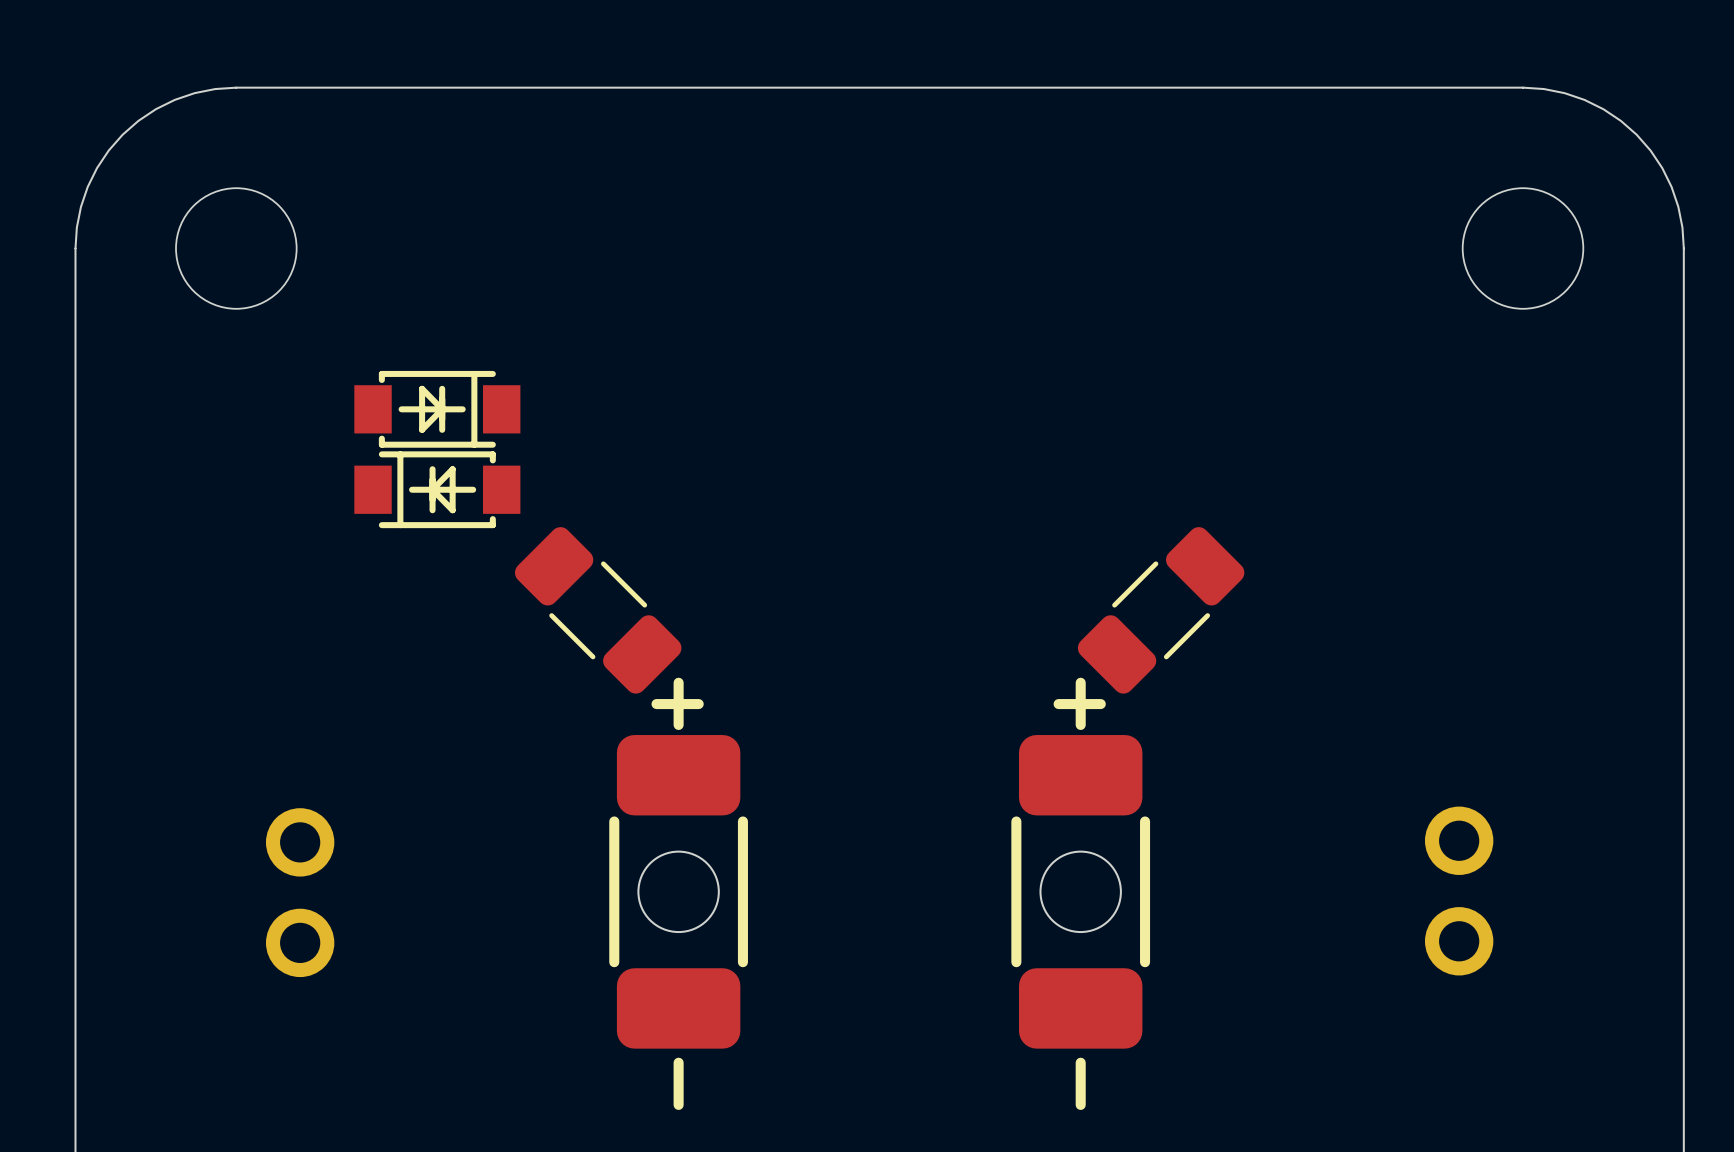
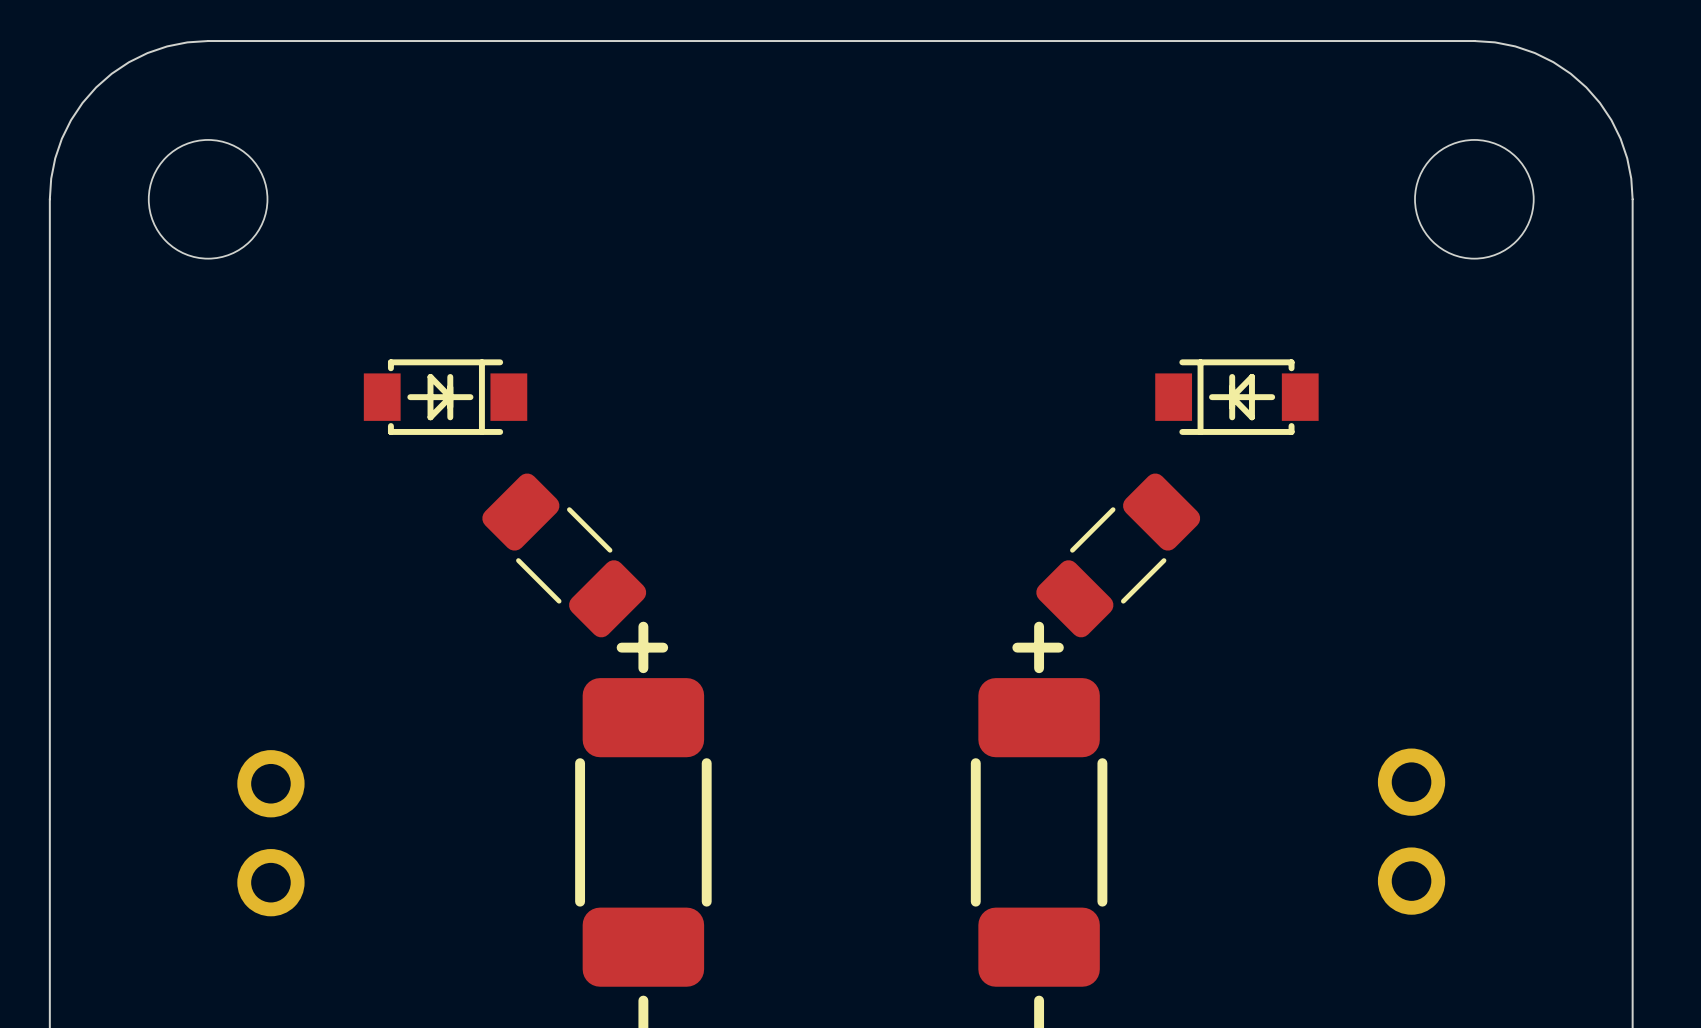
part: (437, 409) -> none
part: none -> (445, 397)
part: none -> (1236, 397)
part: (437, 489) -> none
round board edge: [637, 850, 720, 934] -> none
round board edge: [1039, 850, 1122, 934] -> none

